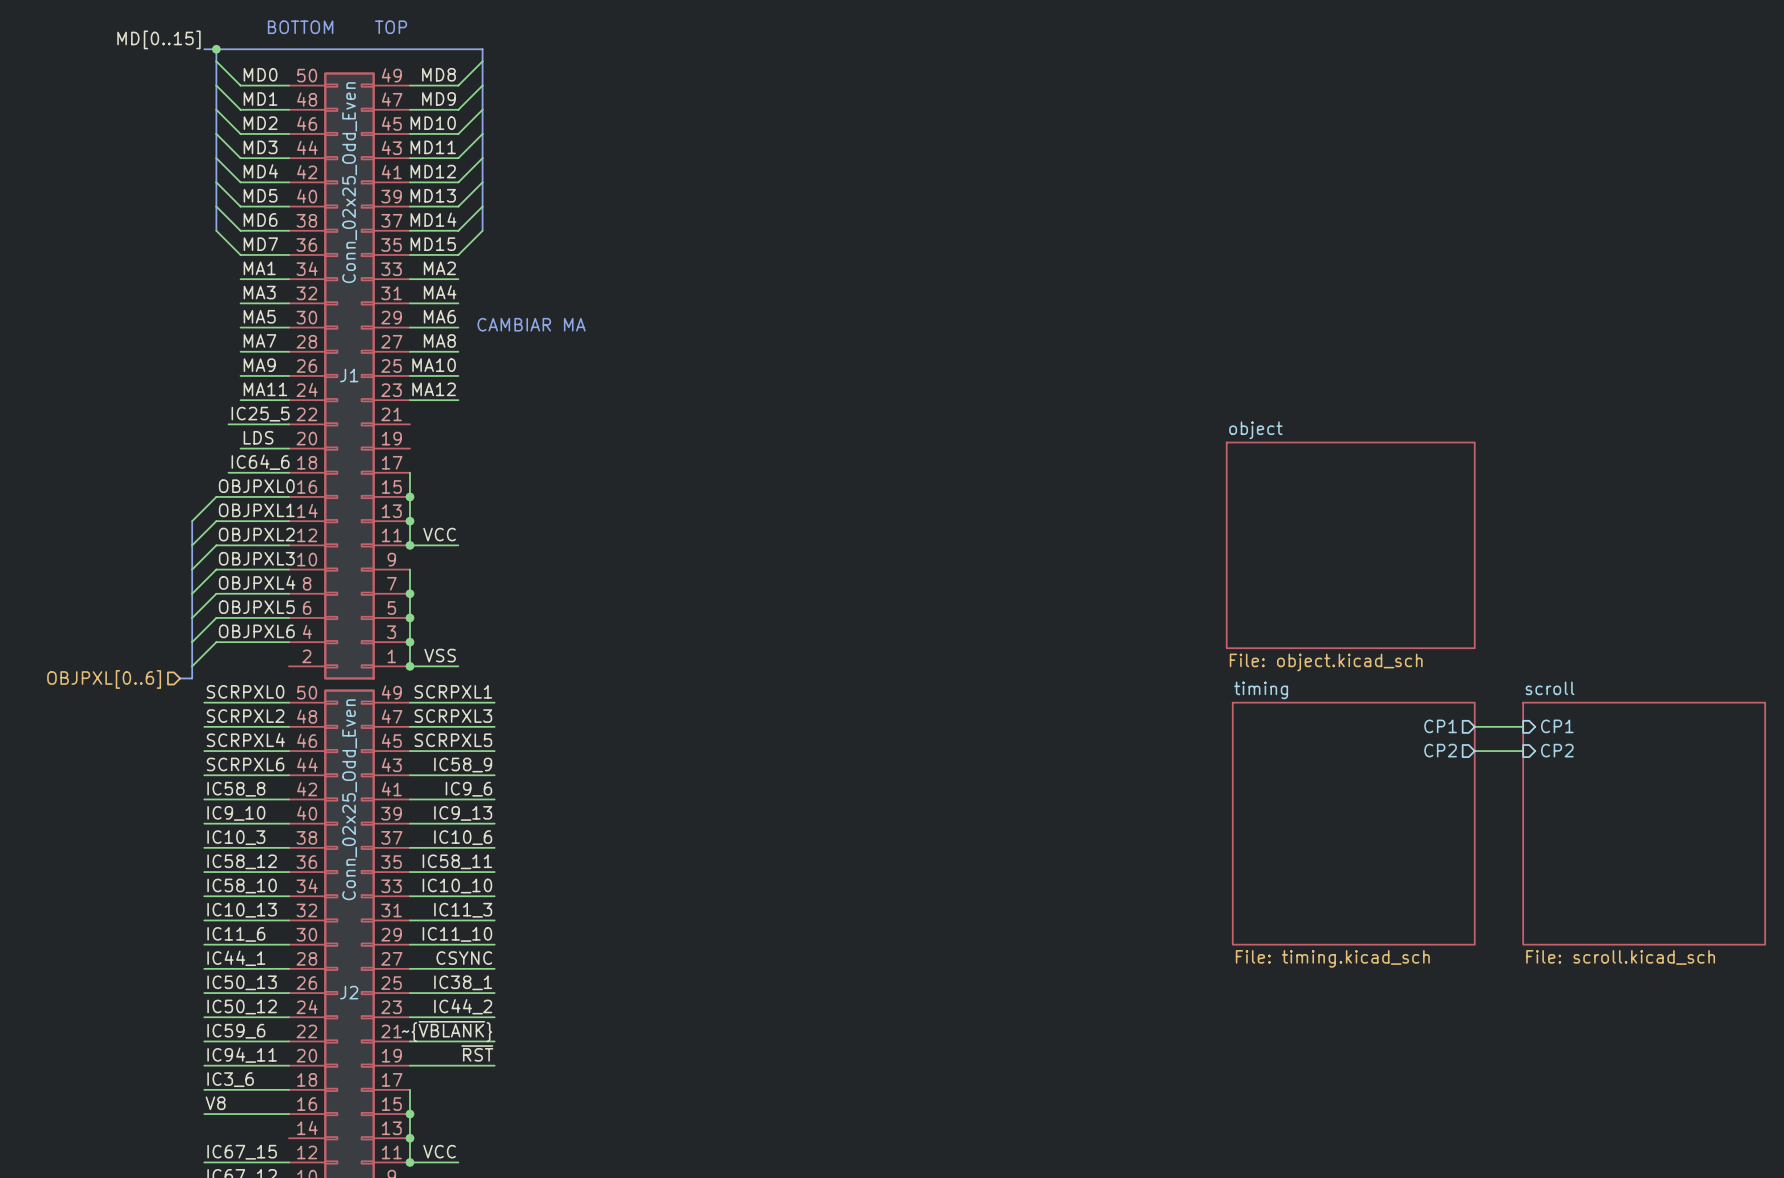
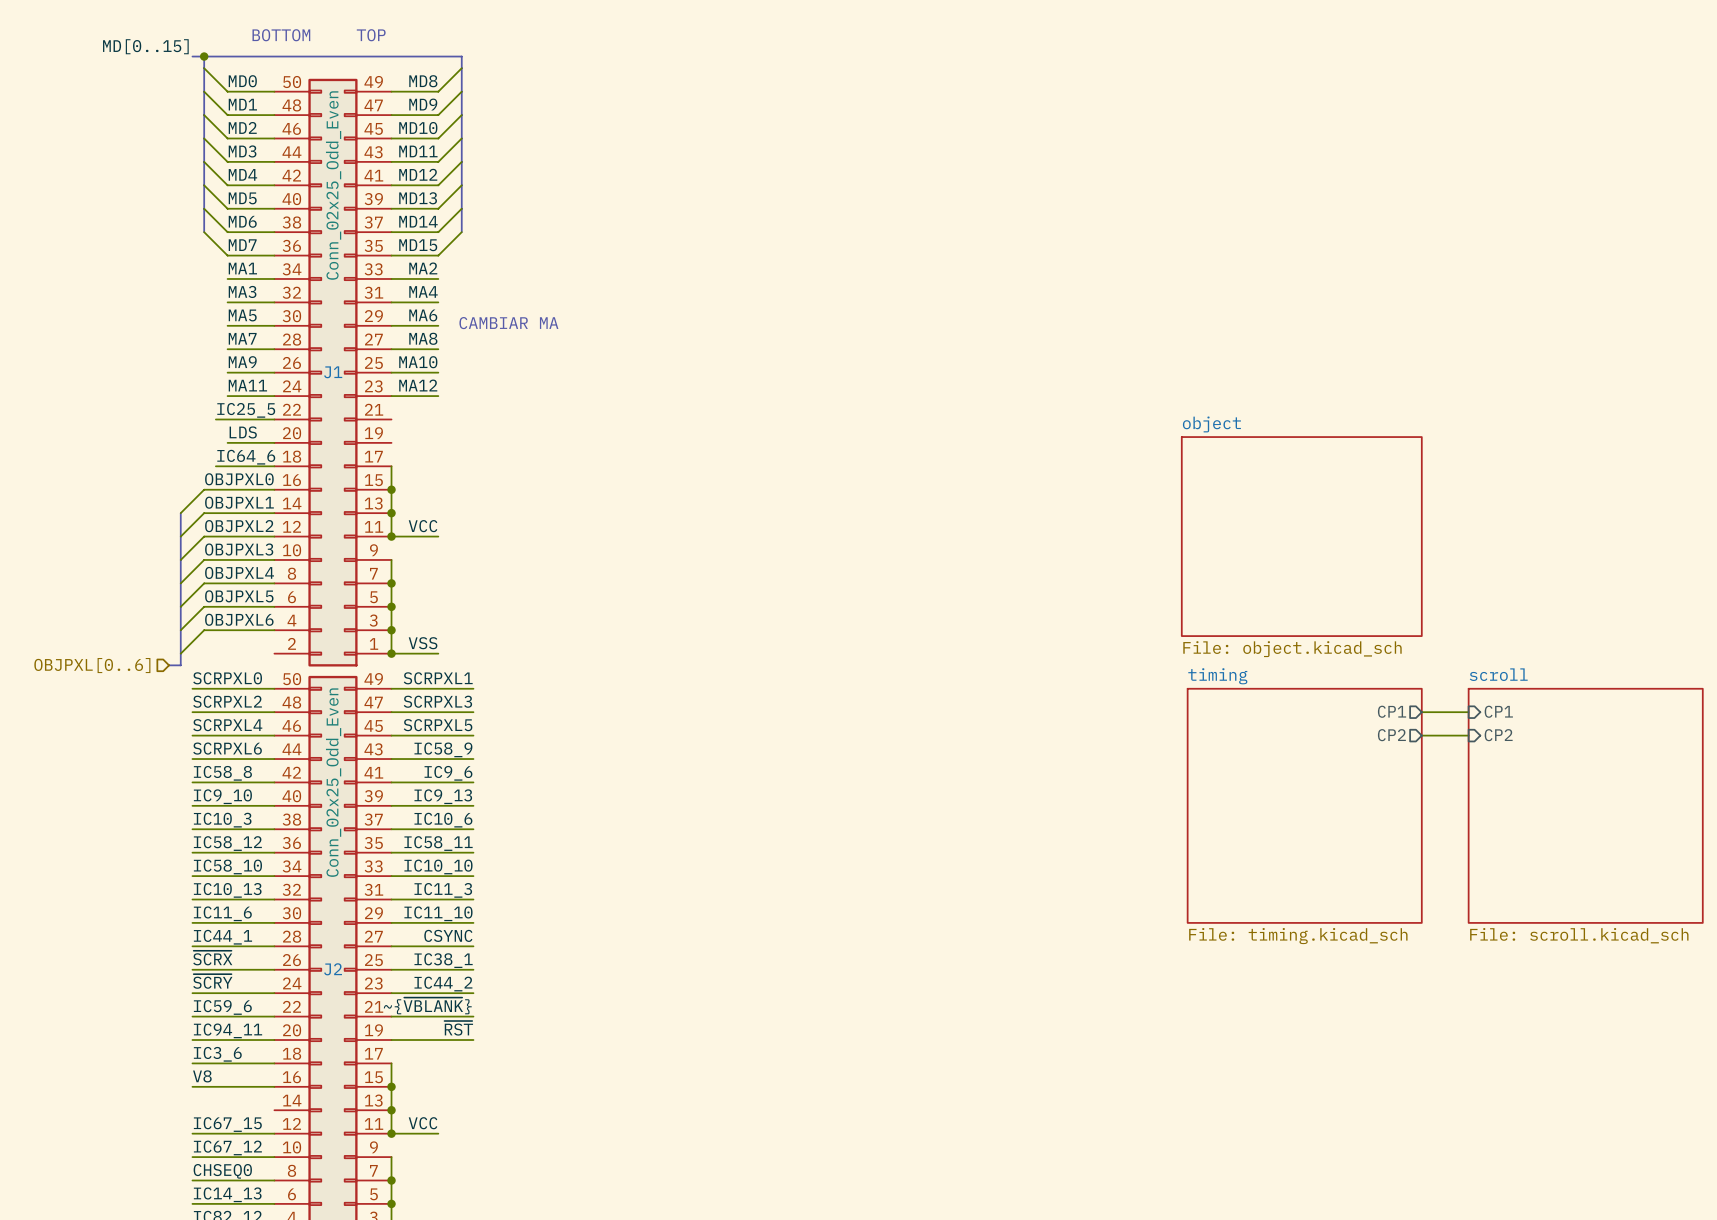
label: IC50_13 (242, 982) -> ~{SCRX} (212, 958)
label: IC50_12 (242, 1007) -> ~{SCRY} (212, 981)

